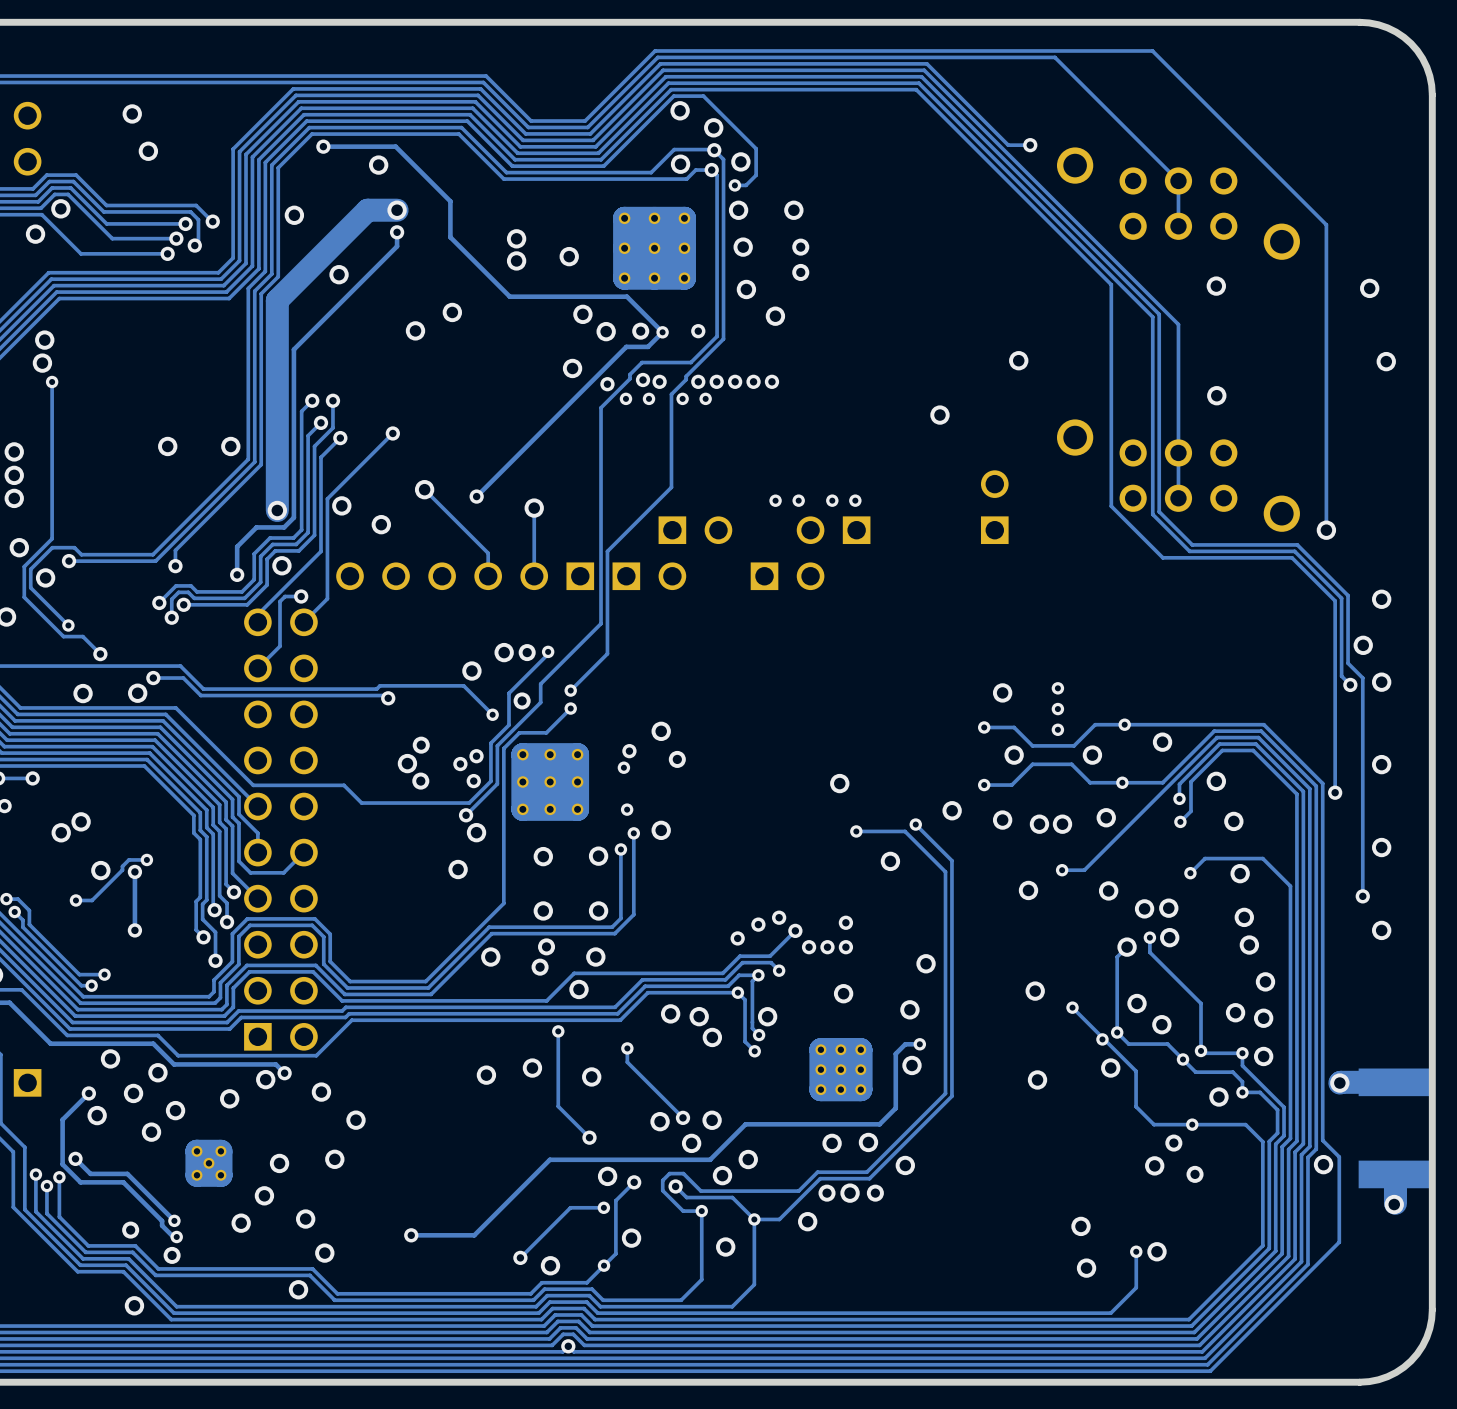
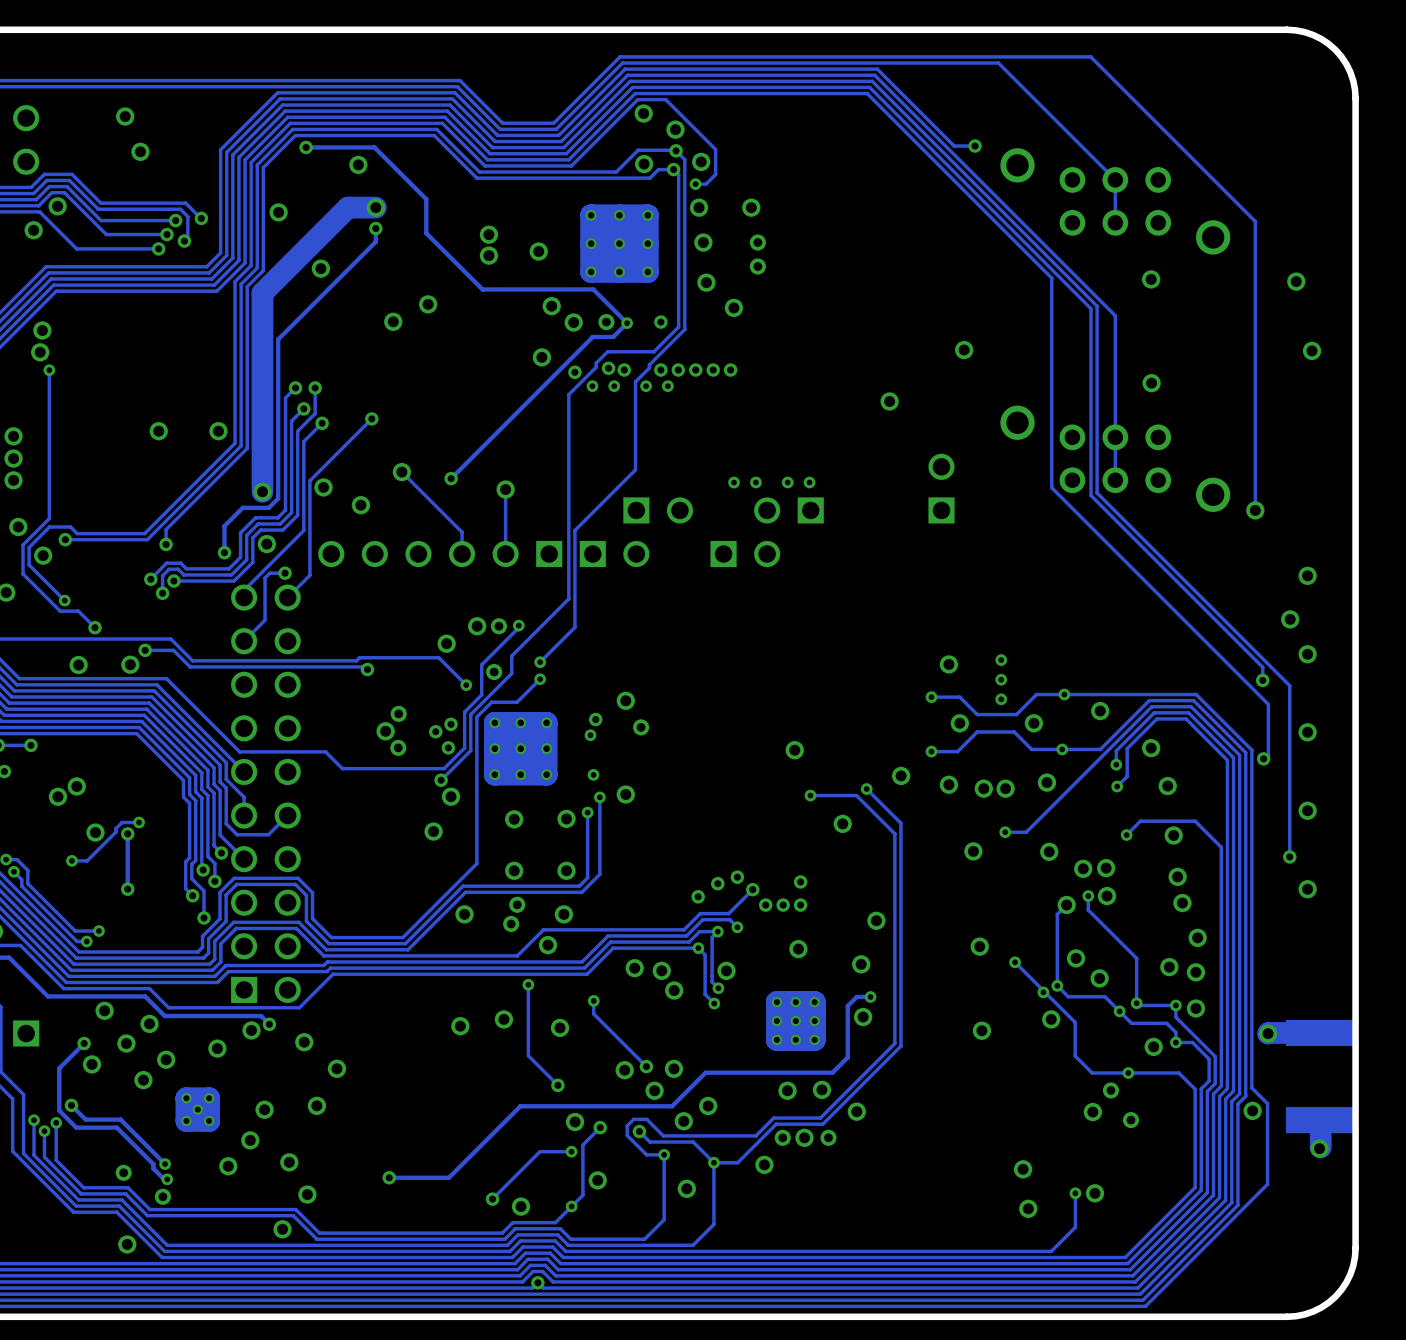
track: (1192, 544) (1297, 544) (1348, 595) (1348, 663) (1362, 678) (1362, 715) -> (1128, 524) (1289, 685)
track: (1189, 551) (1294, 551) (1341, 598) (1341, 676) (1350, 684) -> (1125, 530) (1262, 667) (1262, 680)
track: (1162, 557) (1292, 557) (1335, 600) (1335, 792) -> (1100, 536) (1268, 704) (1268, 758)
via position: (1350, 684) -> (1262, 680)

